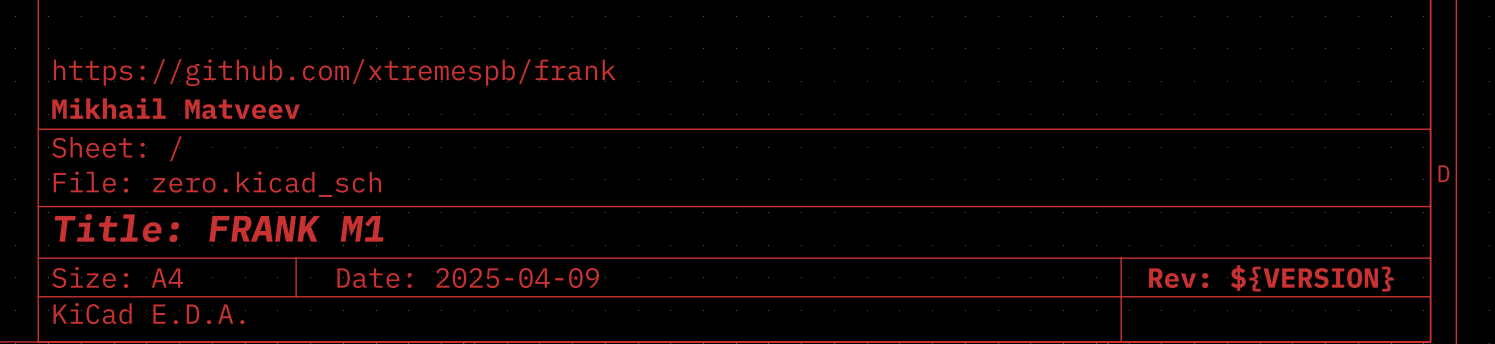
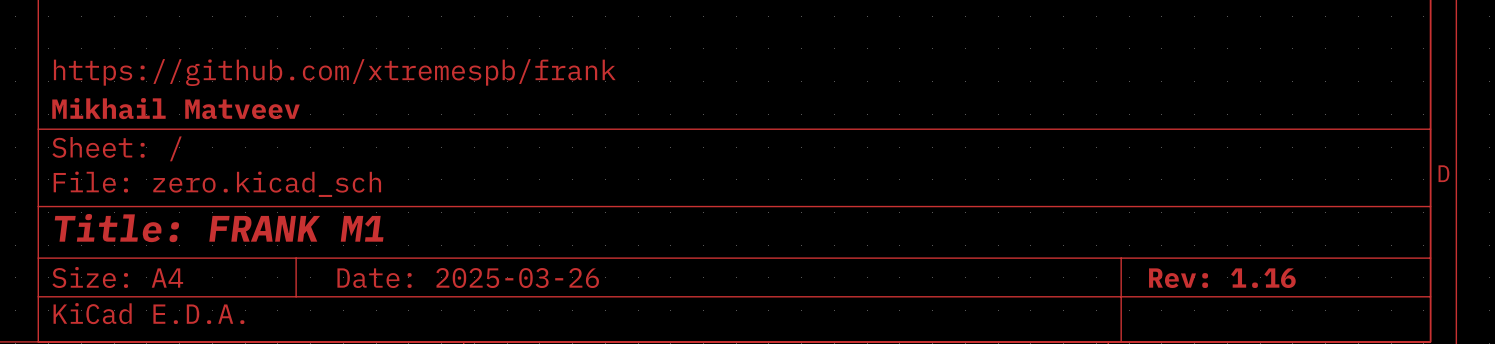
title block: Date: 2025-04-09 (468, 278) -> Date: 2025-03-26 (468, 278)
title block: Rev: ${VERSION} (1271, 278) -> Rev: 1.16 (1222, 278)

